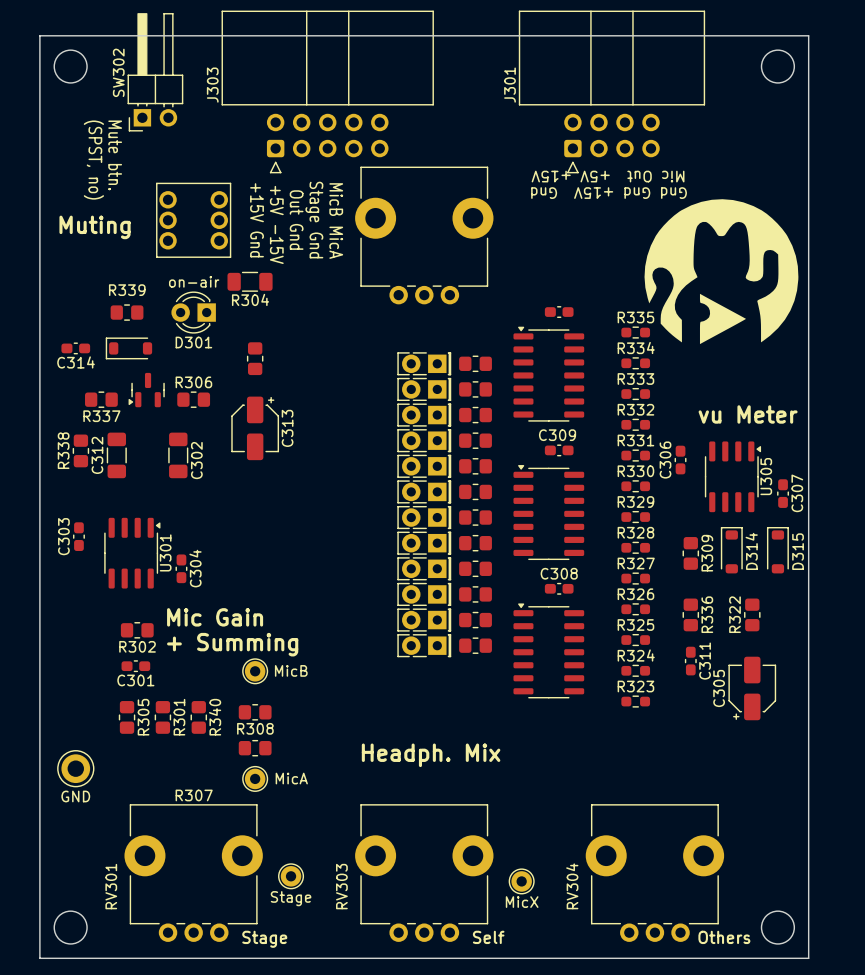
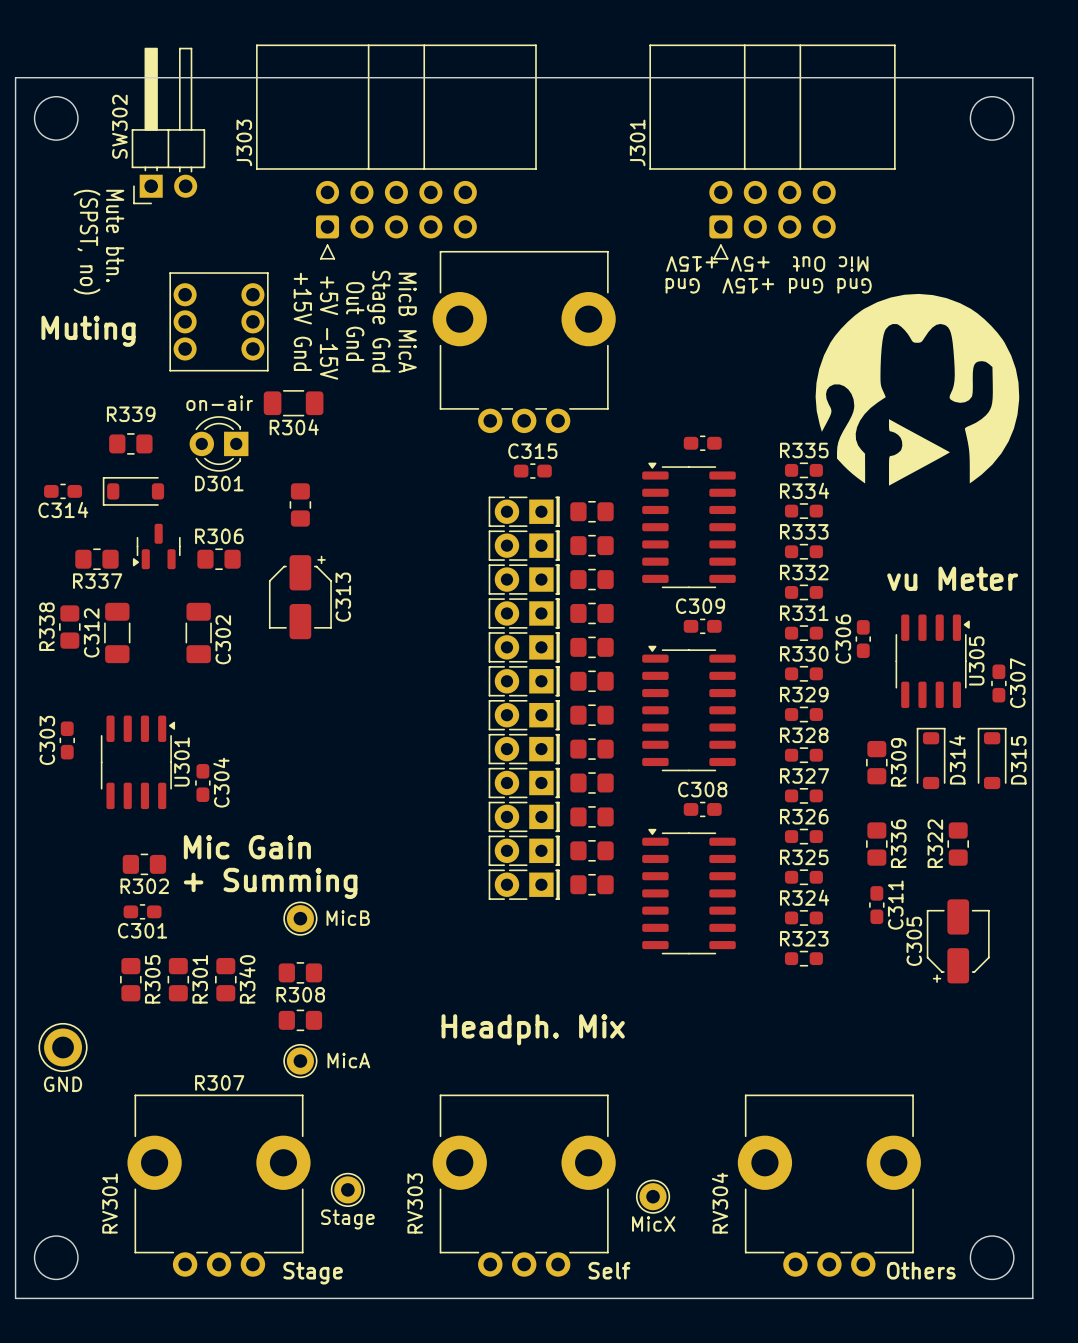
C315: none -> (532, 471)

